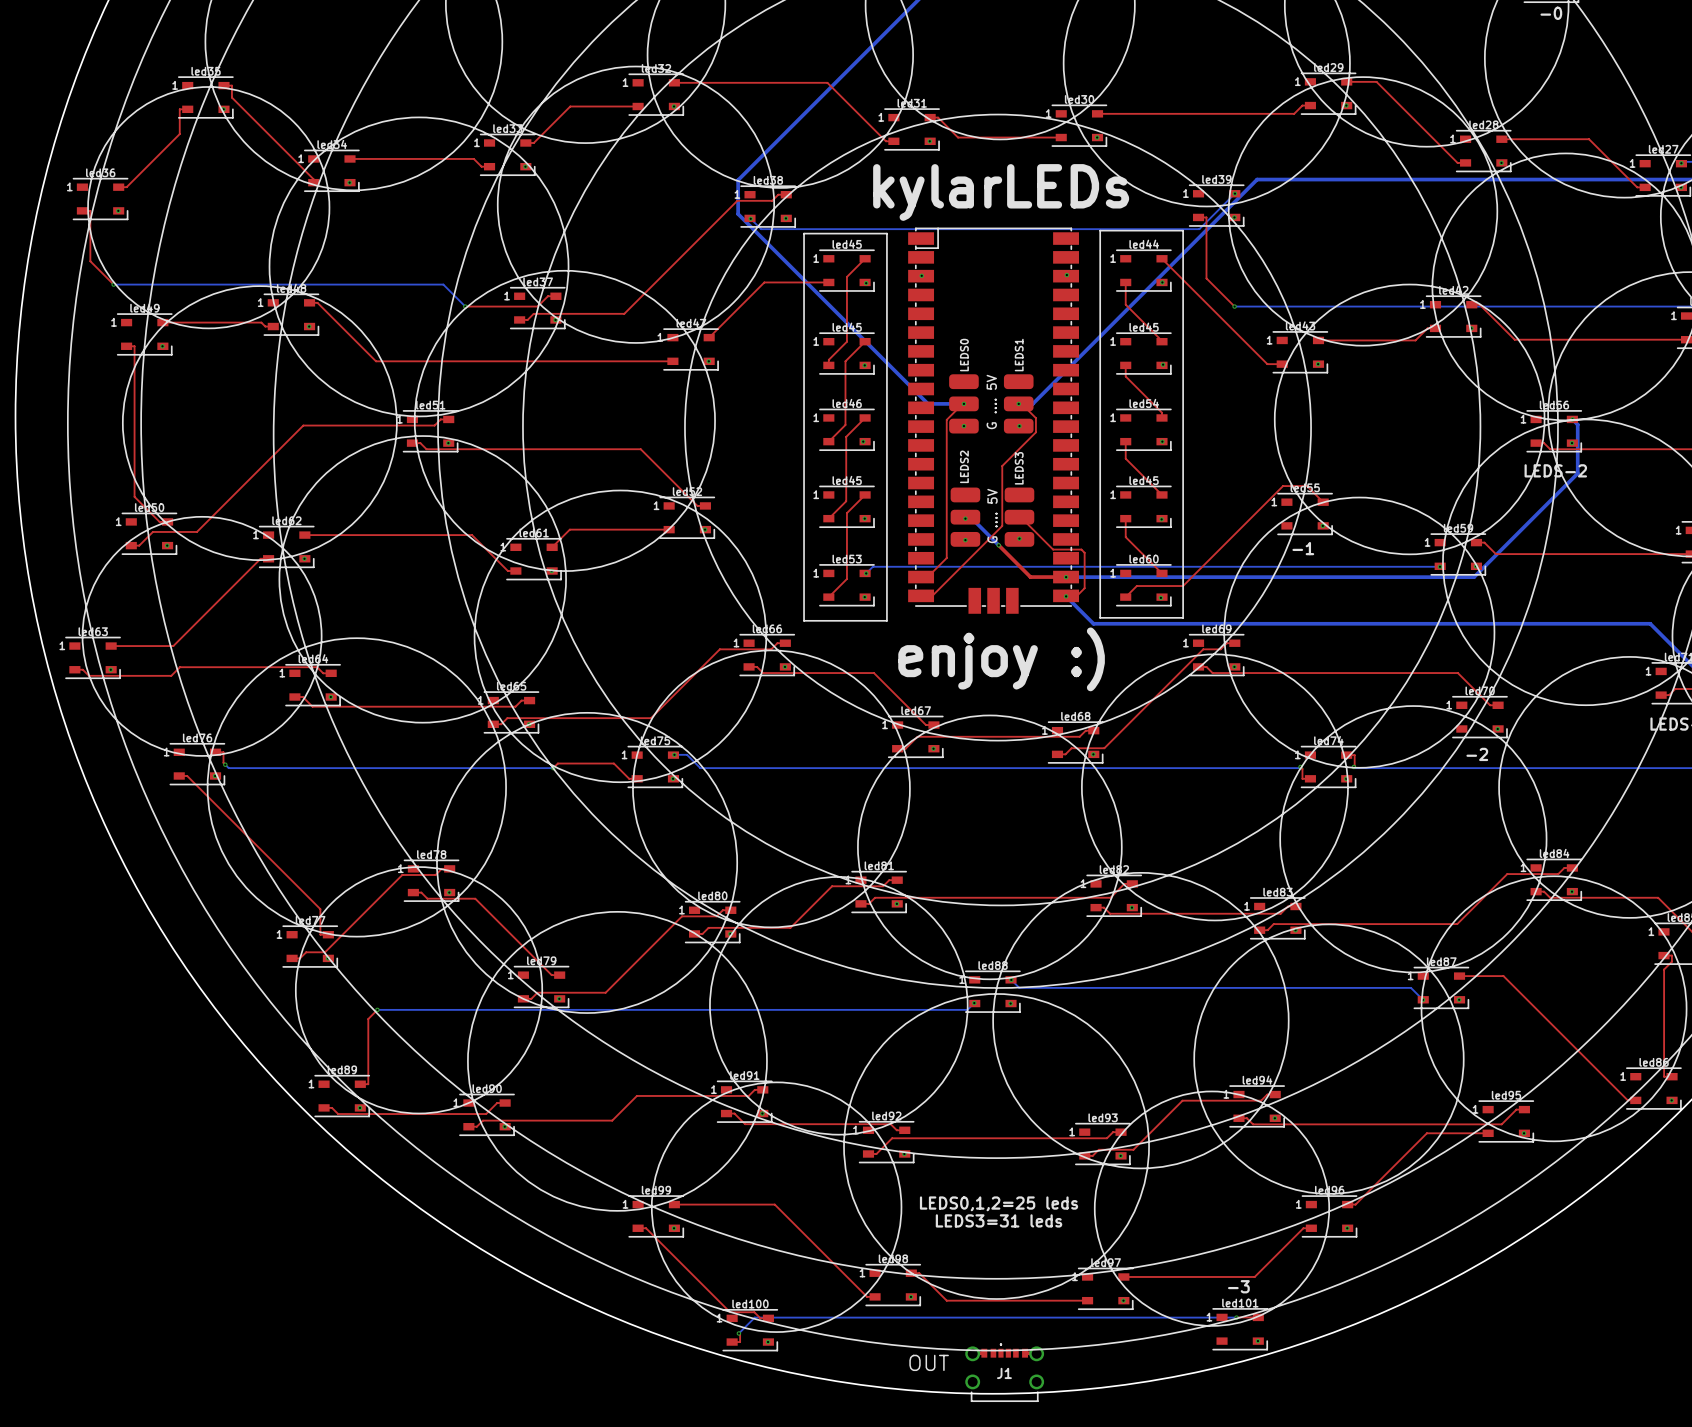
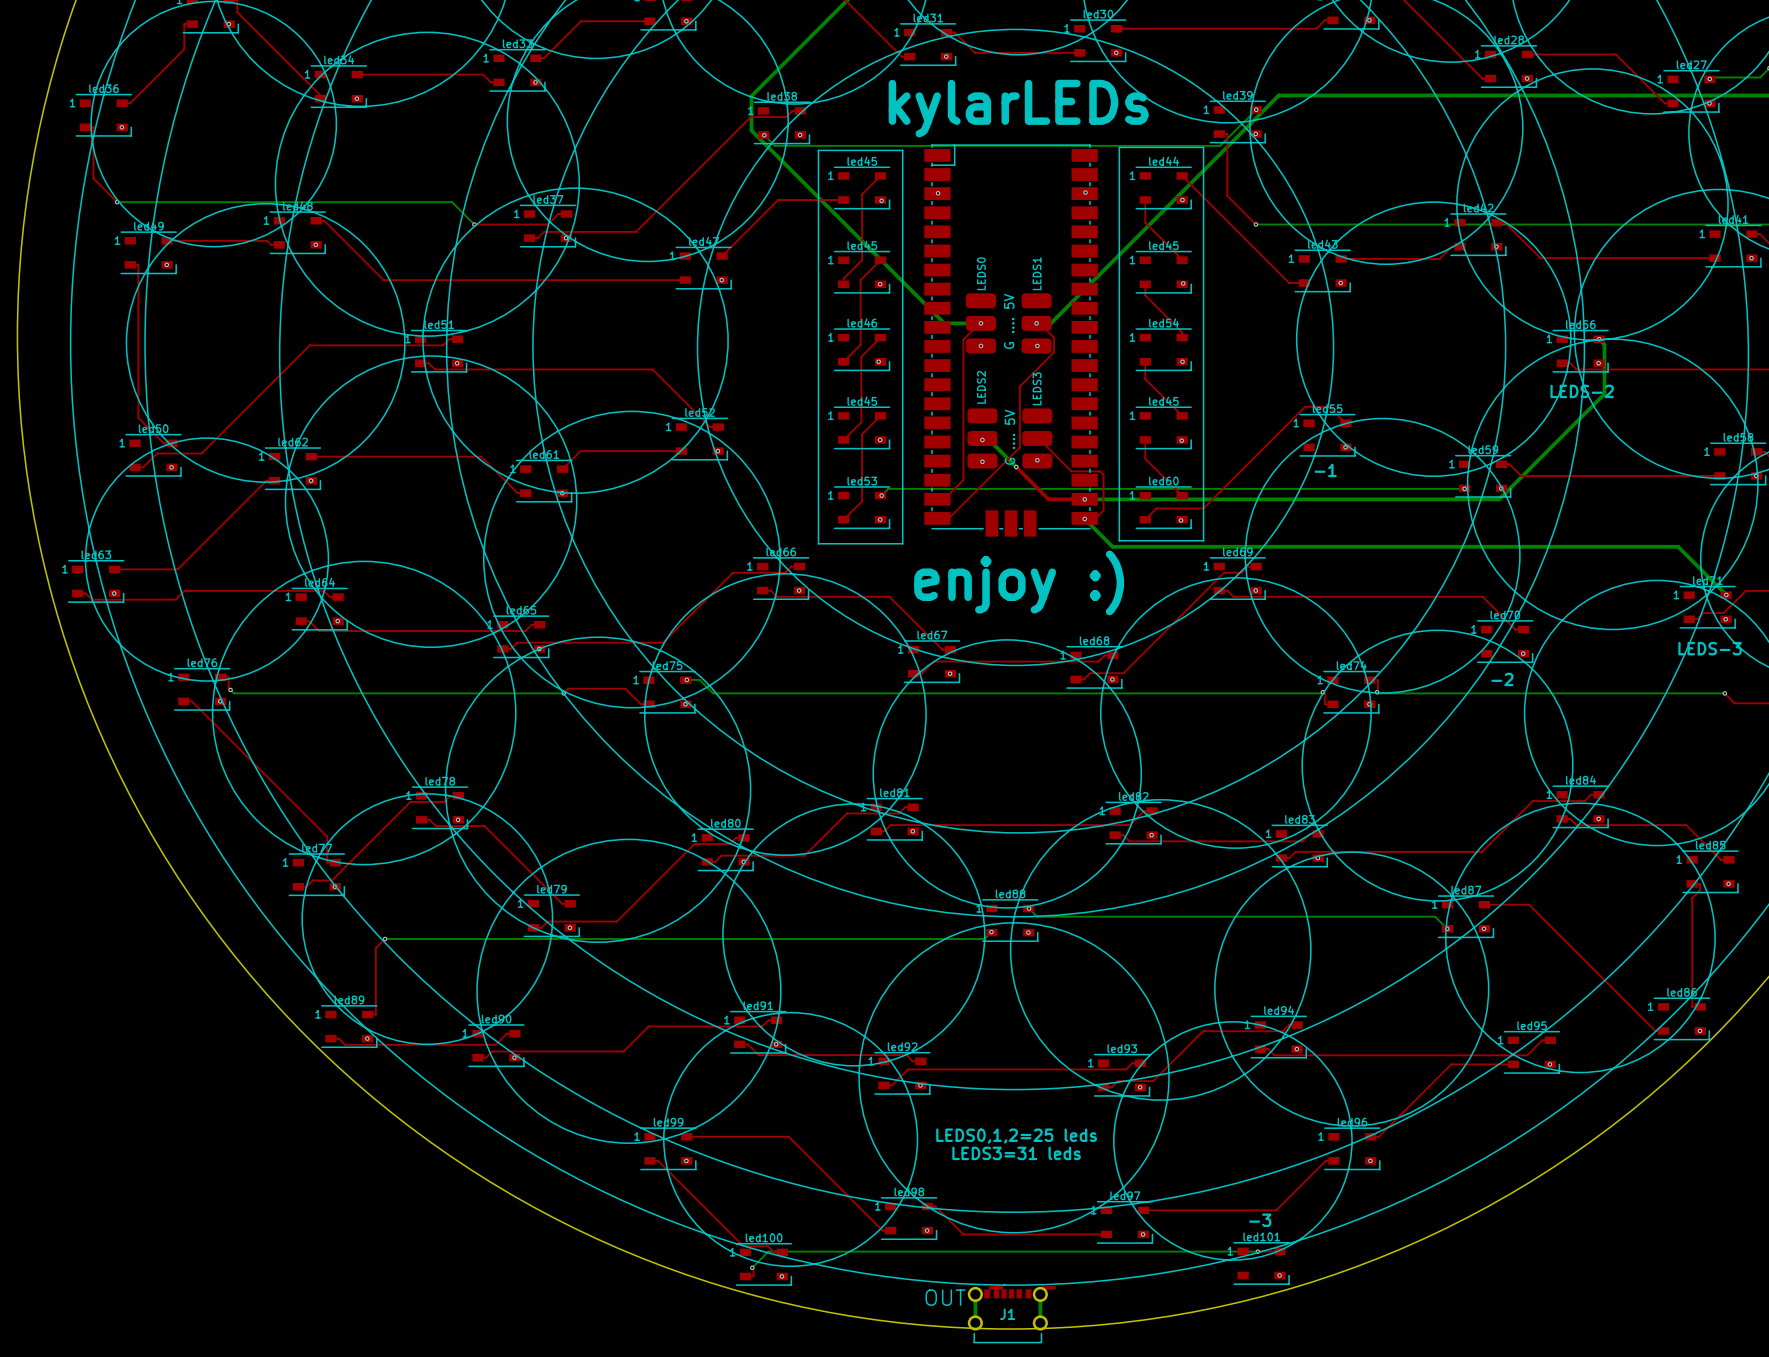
bottom track: none -> (975, 1294) (975, 1322)
bottom track: none -> (1040, 1294) (1040, 1322)
J1 position: (1004, 1372) -> (1007, 1313)

